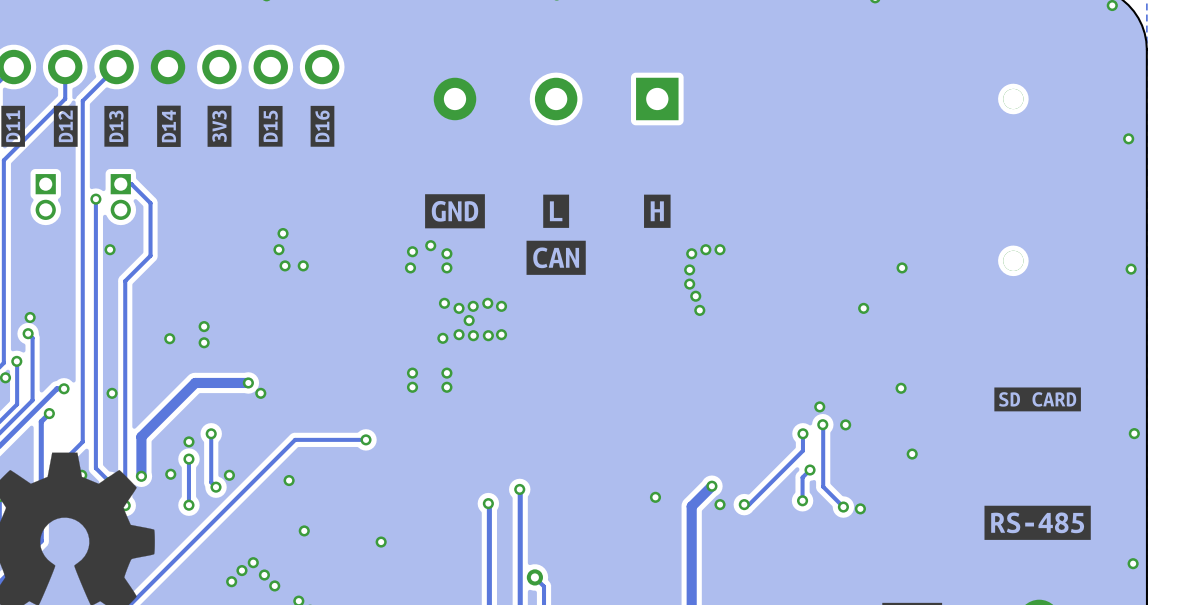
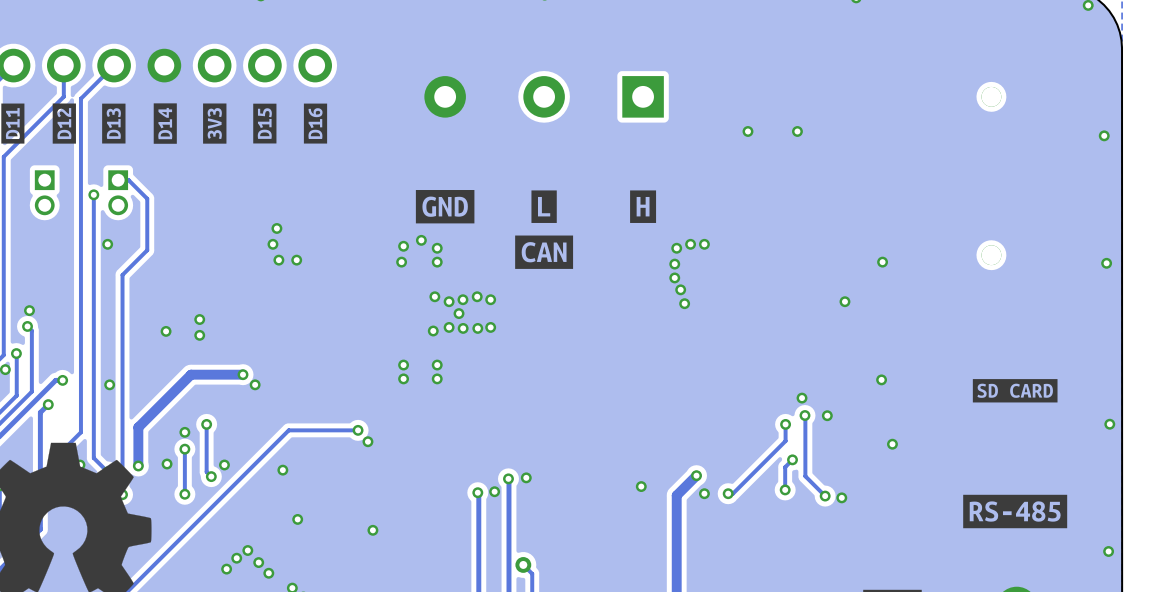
via: none -> (747, 131)
via: none -> (797, 131)
via: none -> (367, 441)
via: none -> (526, 477)
via: none -> (494, 491)

